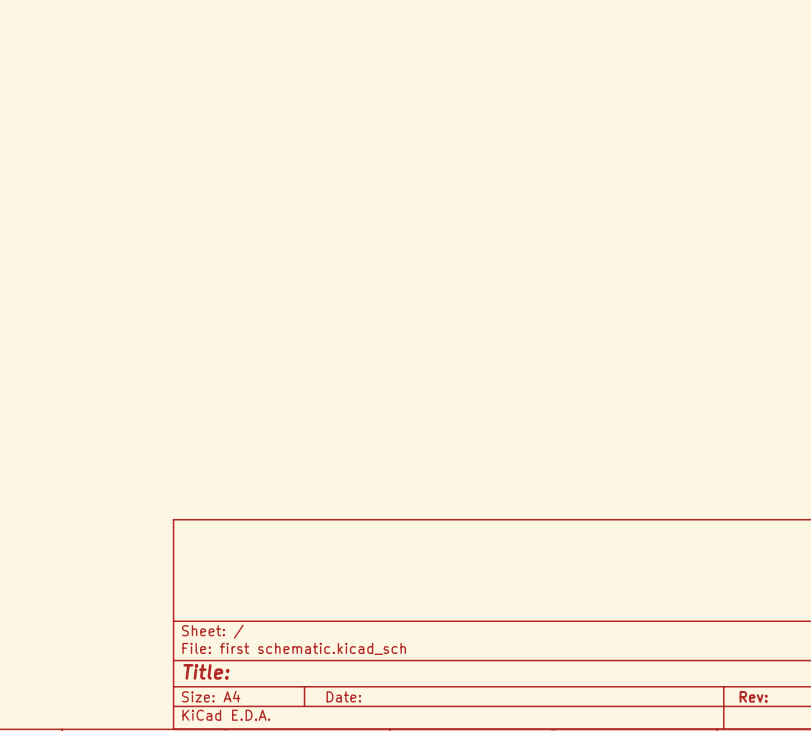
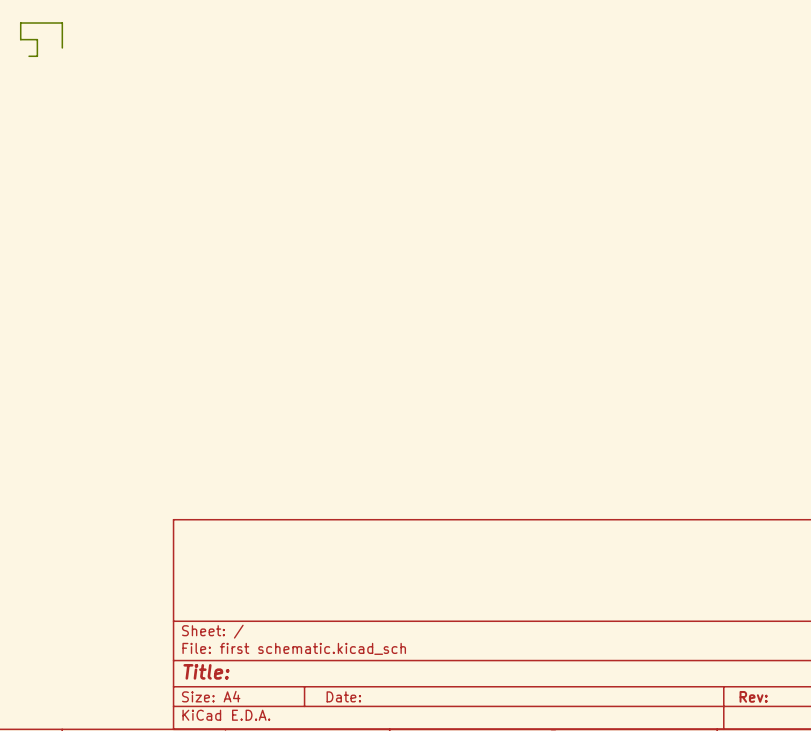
wire: none -> (62, 47) (62, 23) (20, 23) (20, 39) (37, 39) (37, 56) (29, 56)

